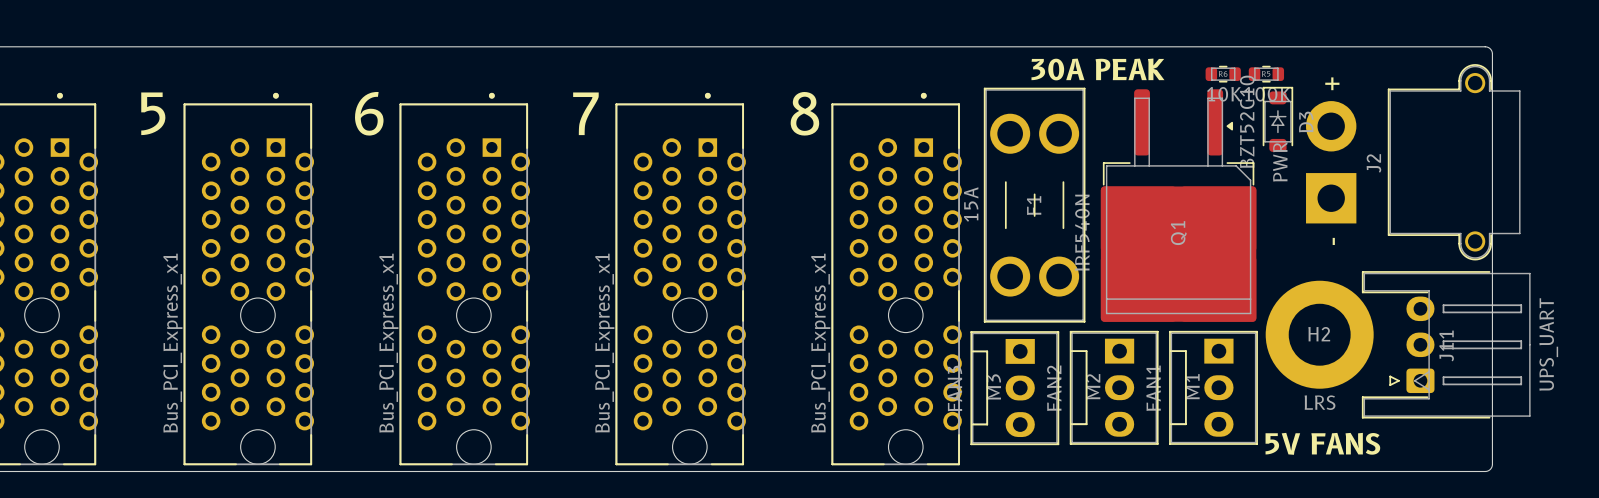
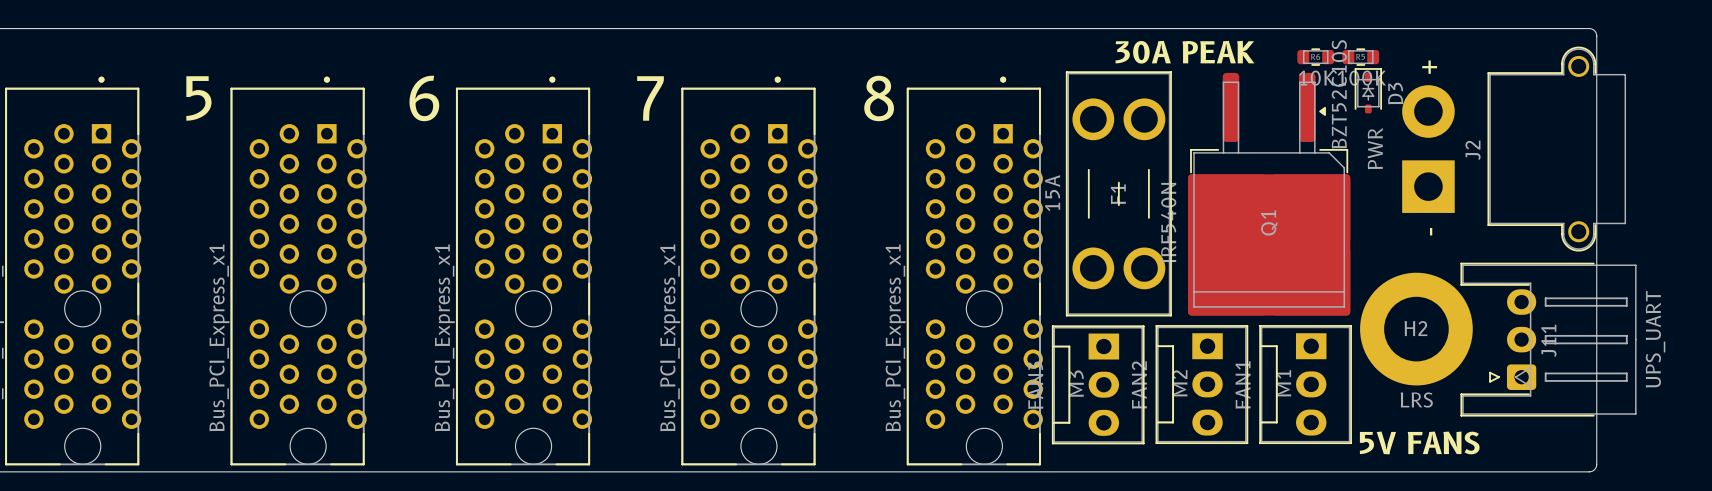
D3 footprint: [1262, 86, 1294, 152] -> [1354, 68, 1383, 114]
D3 value: BZT52C10 (1247, 121) -> BZT52C10S (1339, 94)

